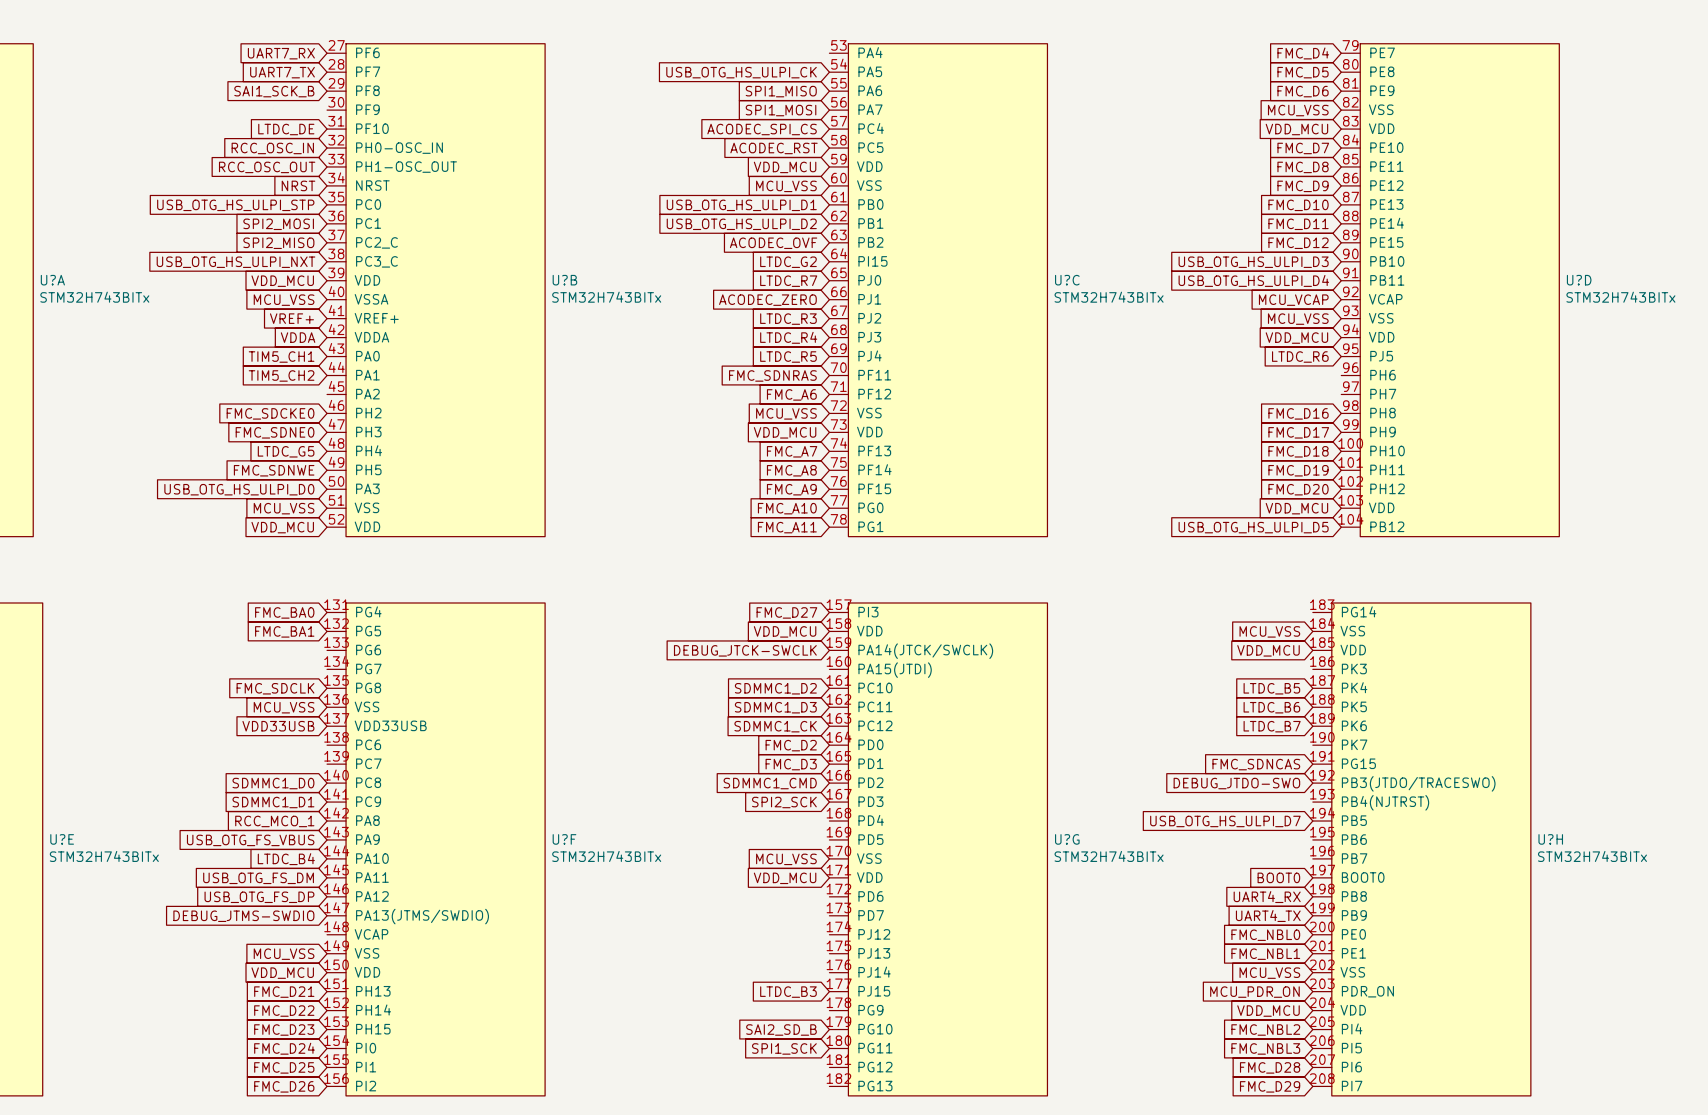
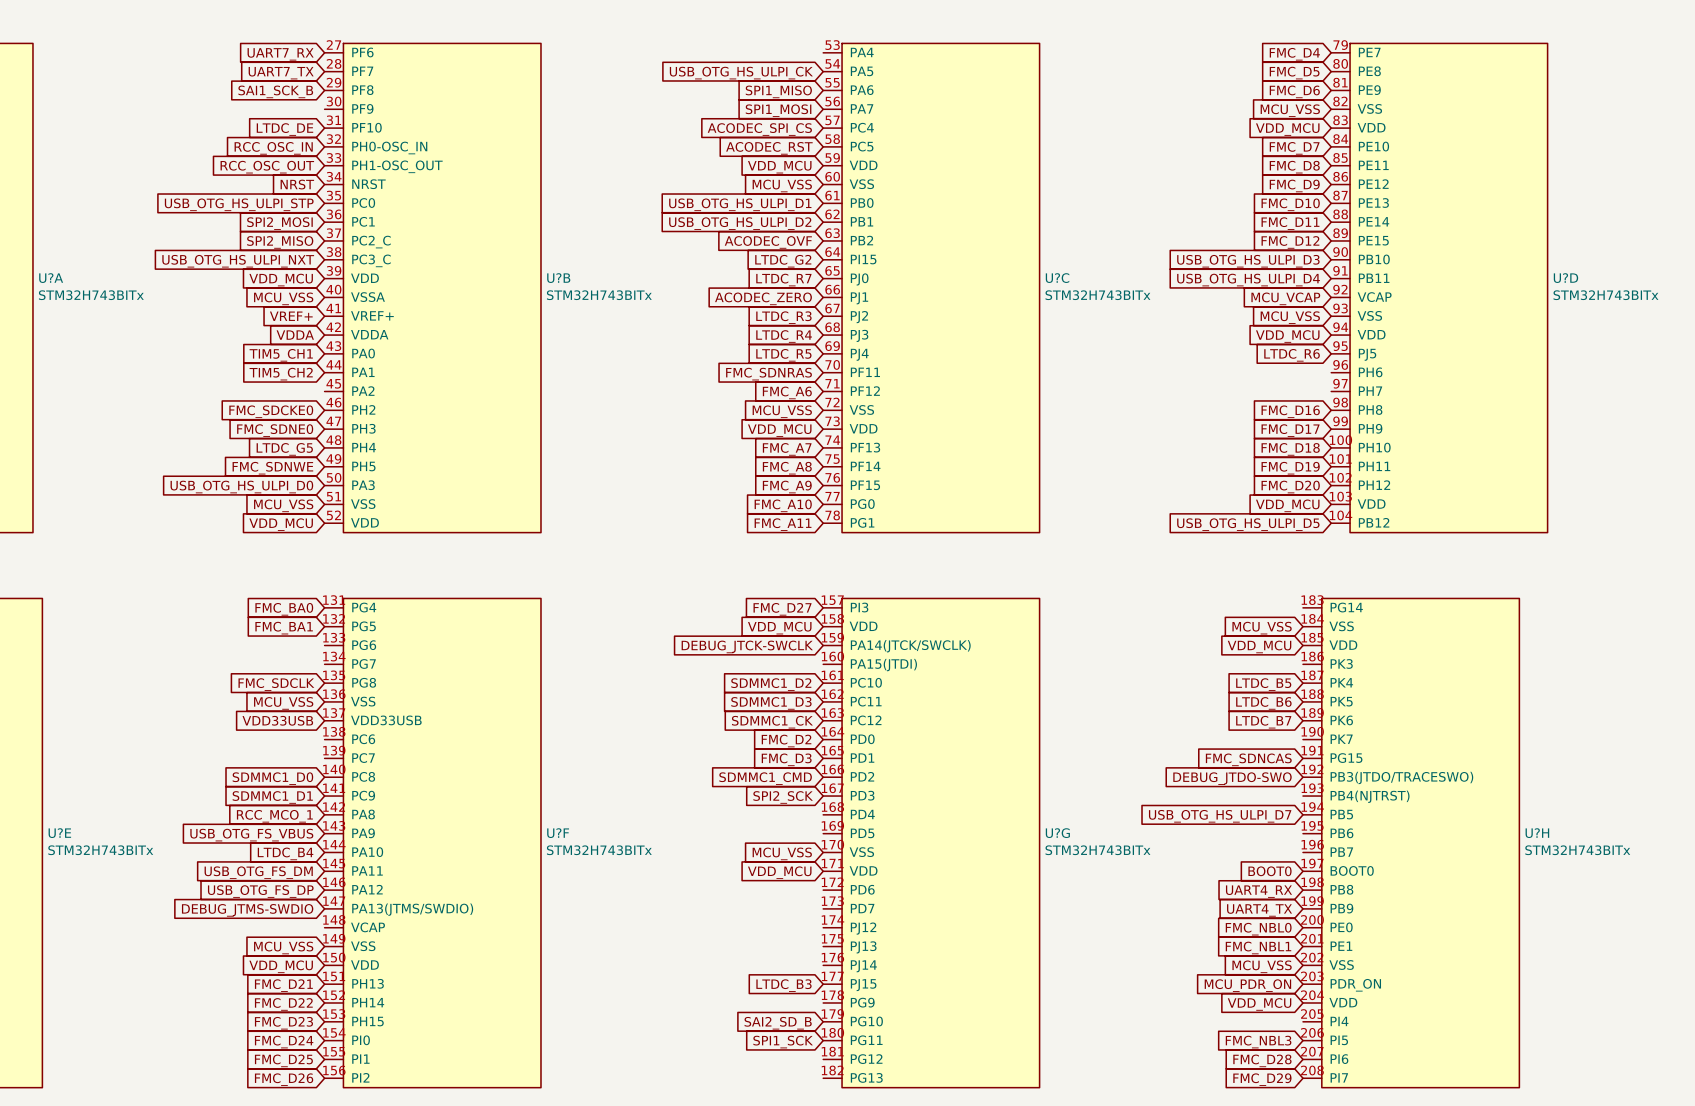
global label: FMC_NBL2 (1265, 1029) -> none

